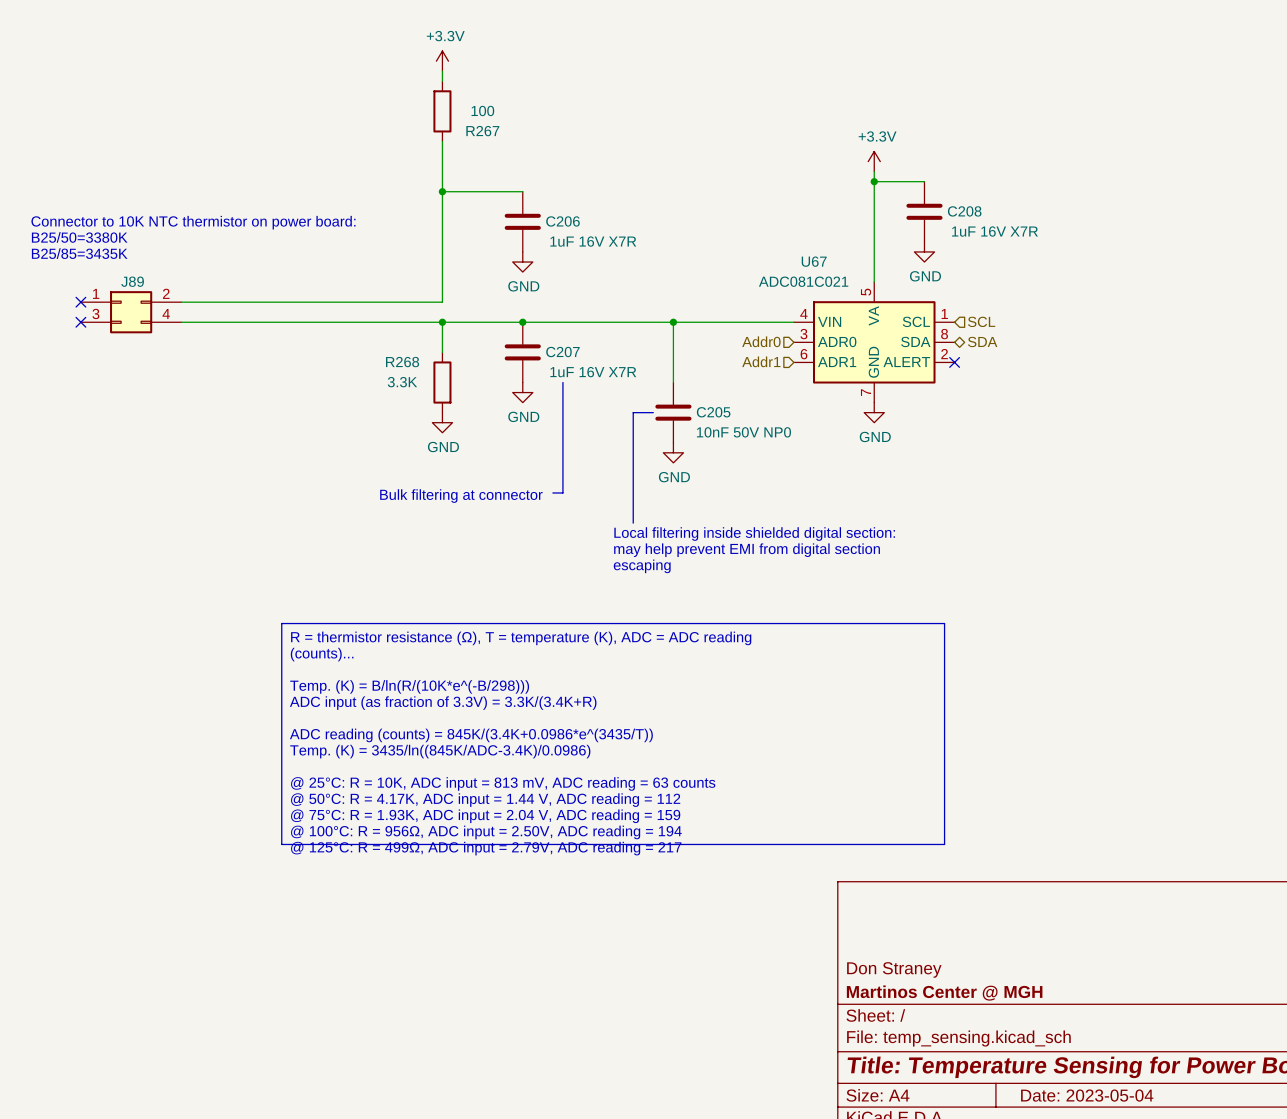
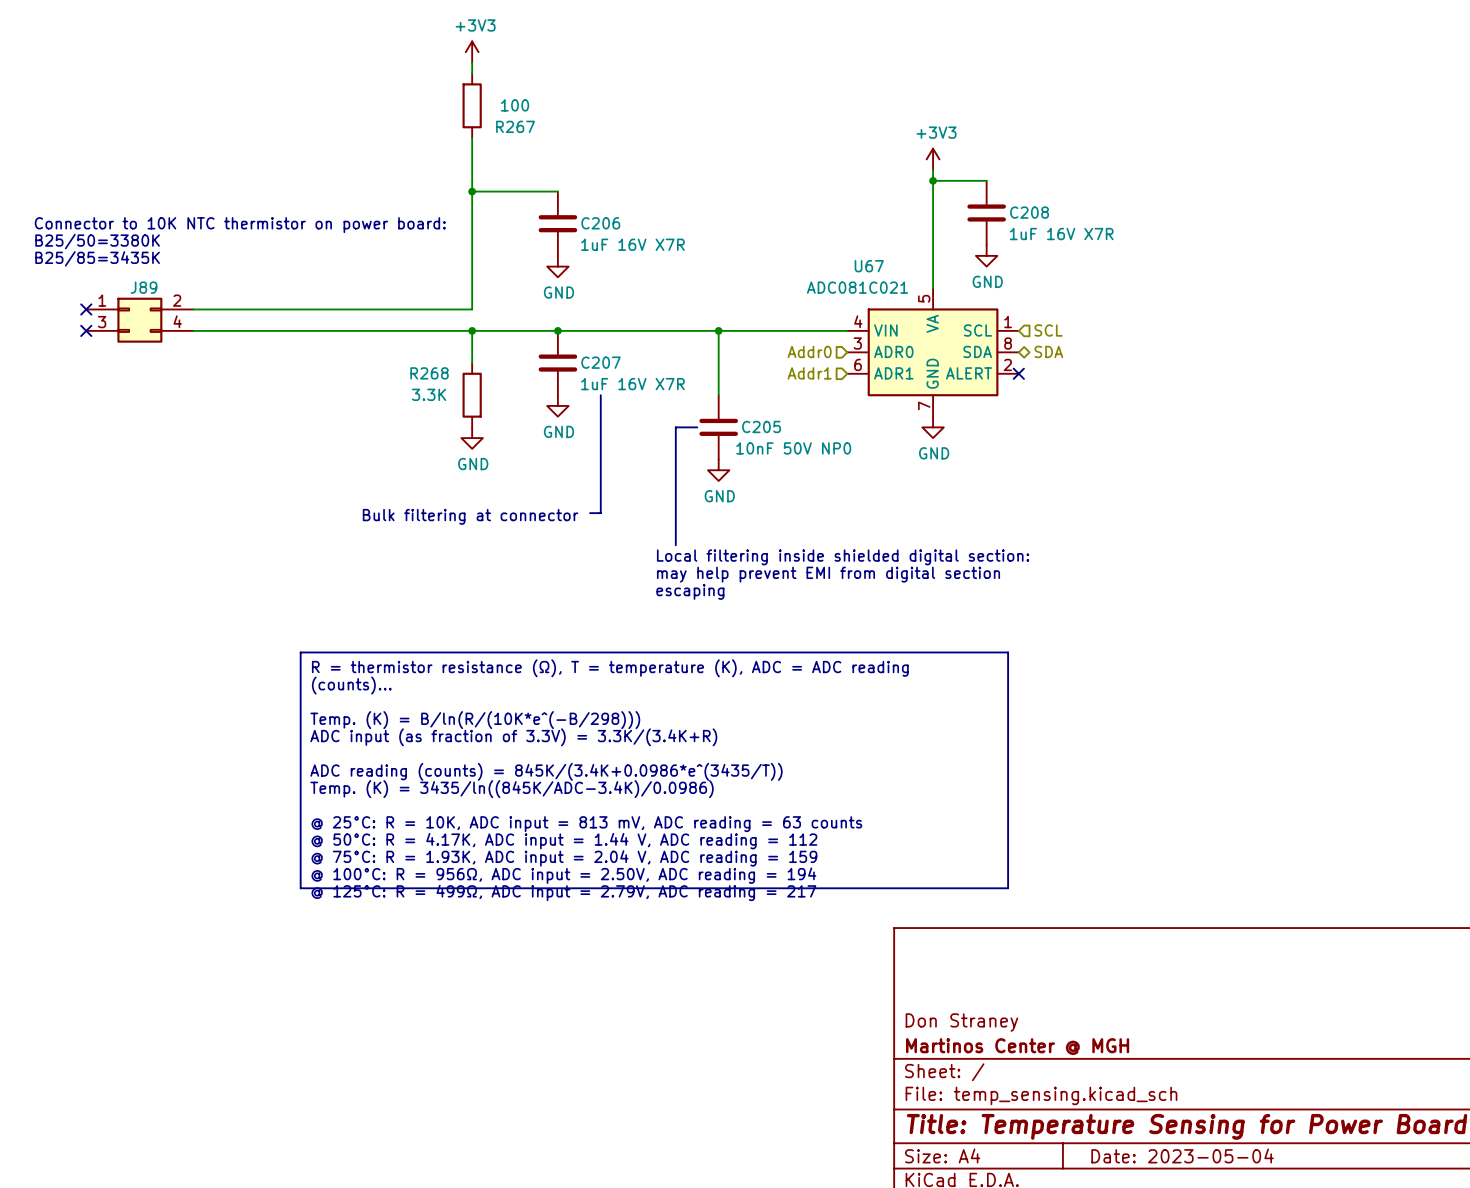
power symbol: +3.3V (442, 61) -> +3V3 (472, 52)
power symbol: +3.3V (874, 161) -> +3V3 (933, 159)

